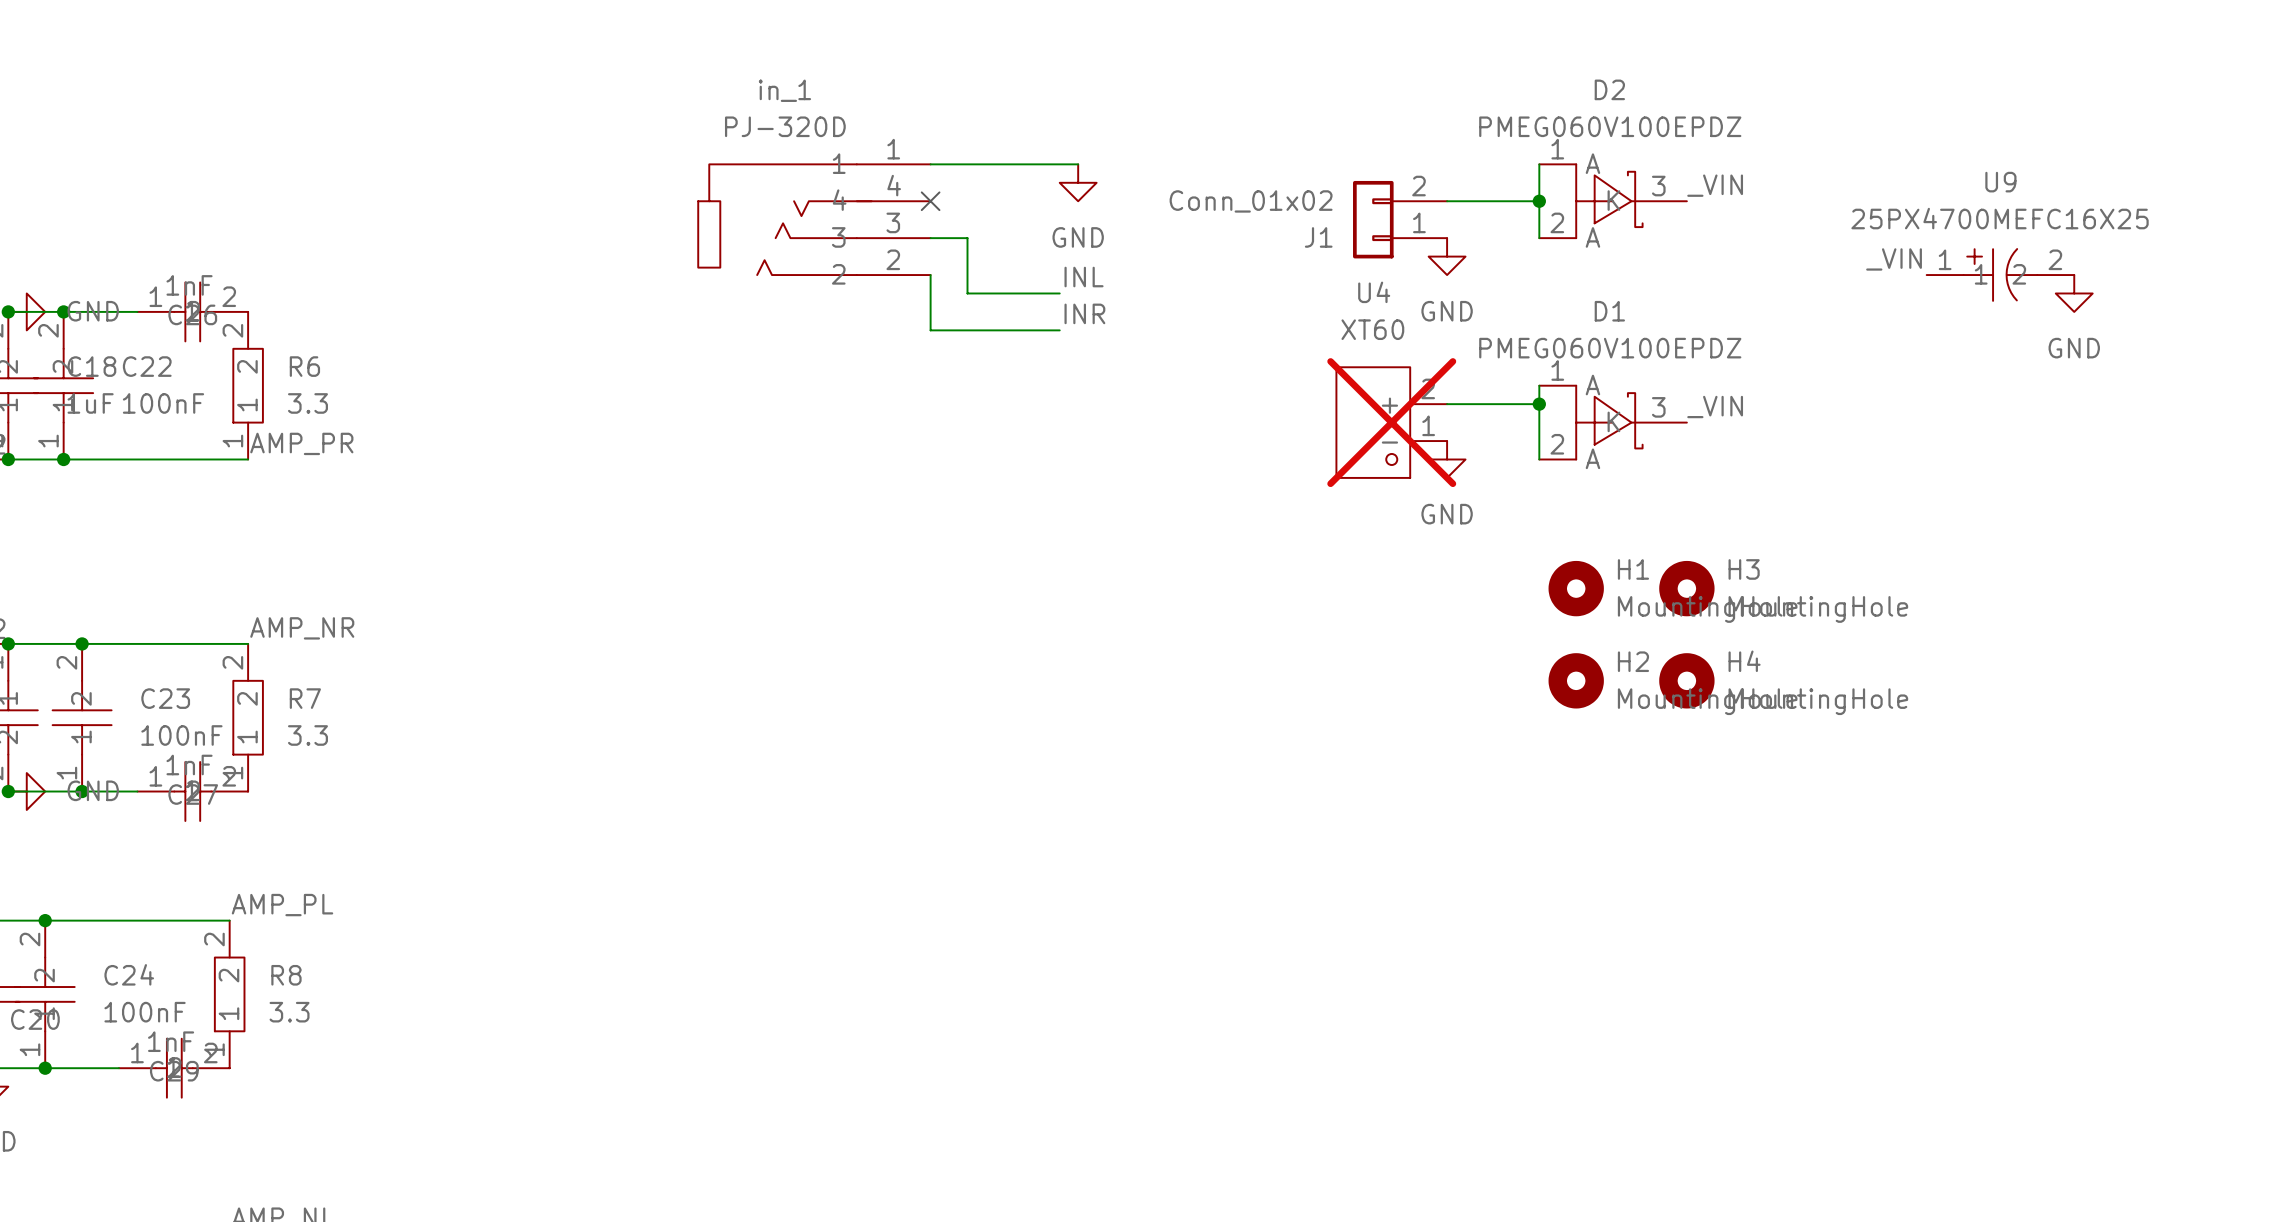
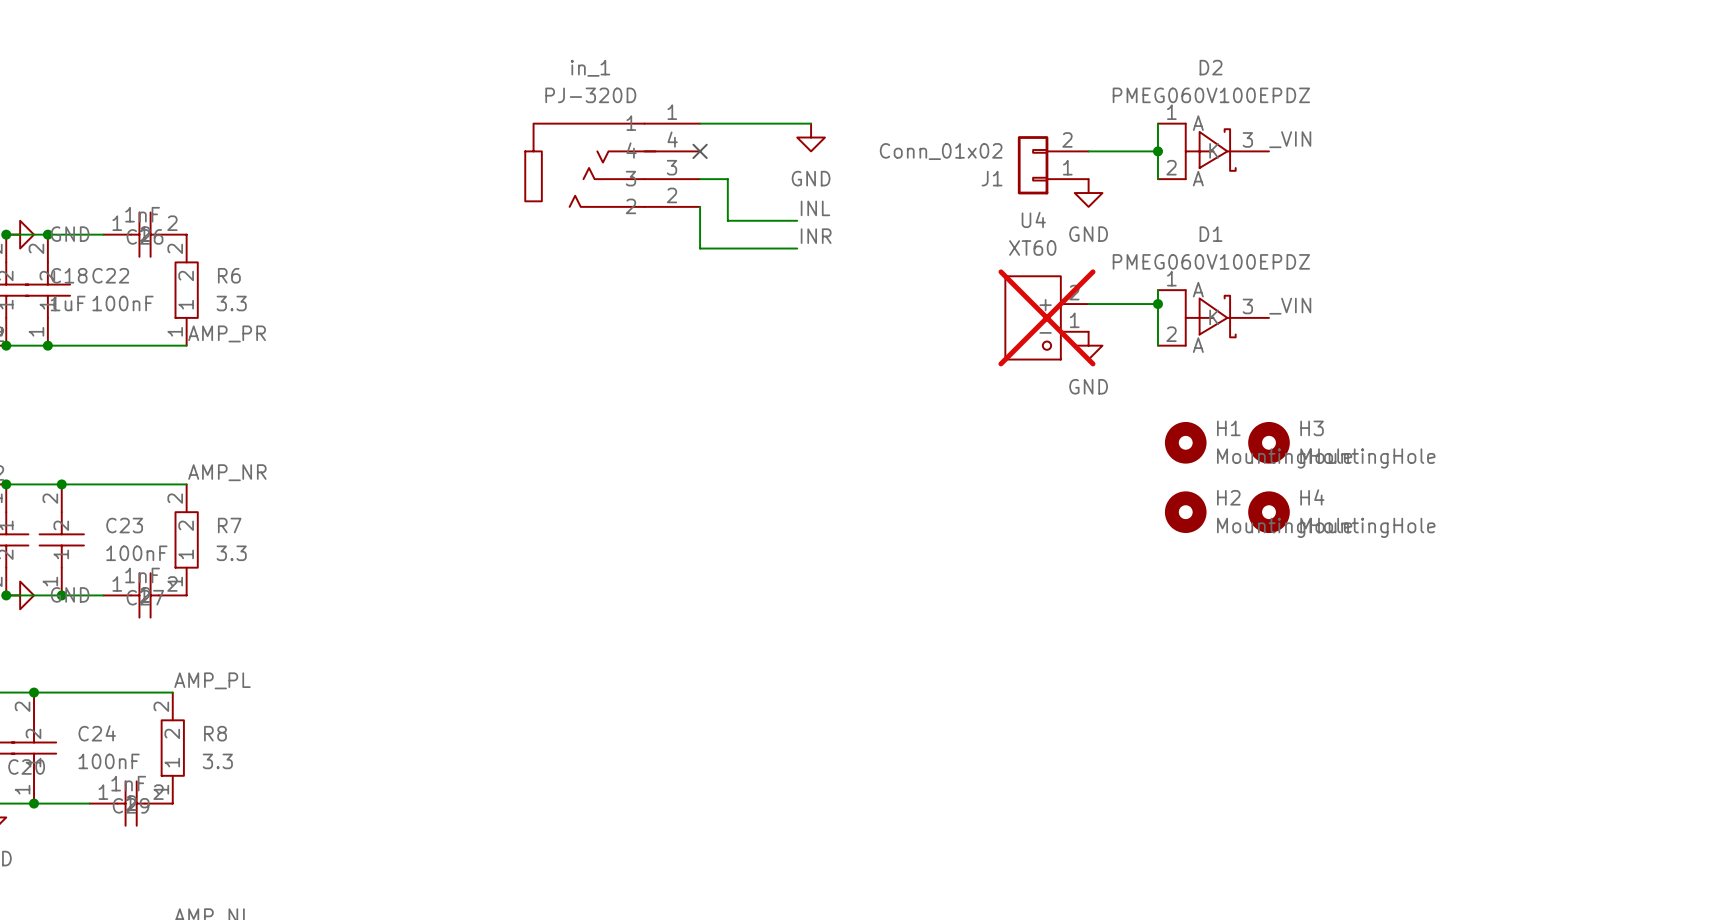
label: _VIN (1894, 259) -> none
U9: 25PX4700MEFC16X25 (2000, 274) -> none
power symbol: GND (2074, 293) -> none

